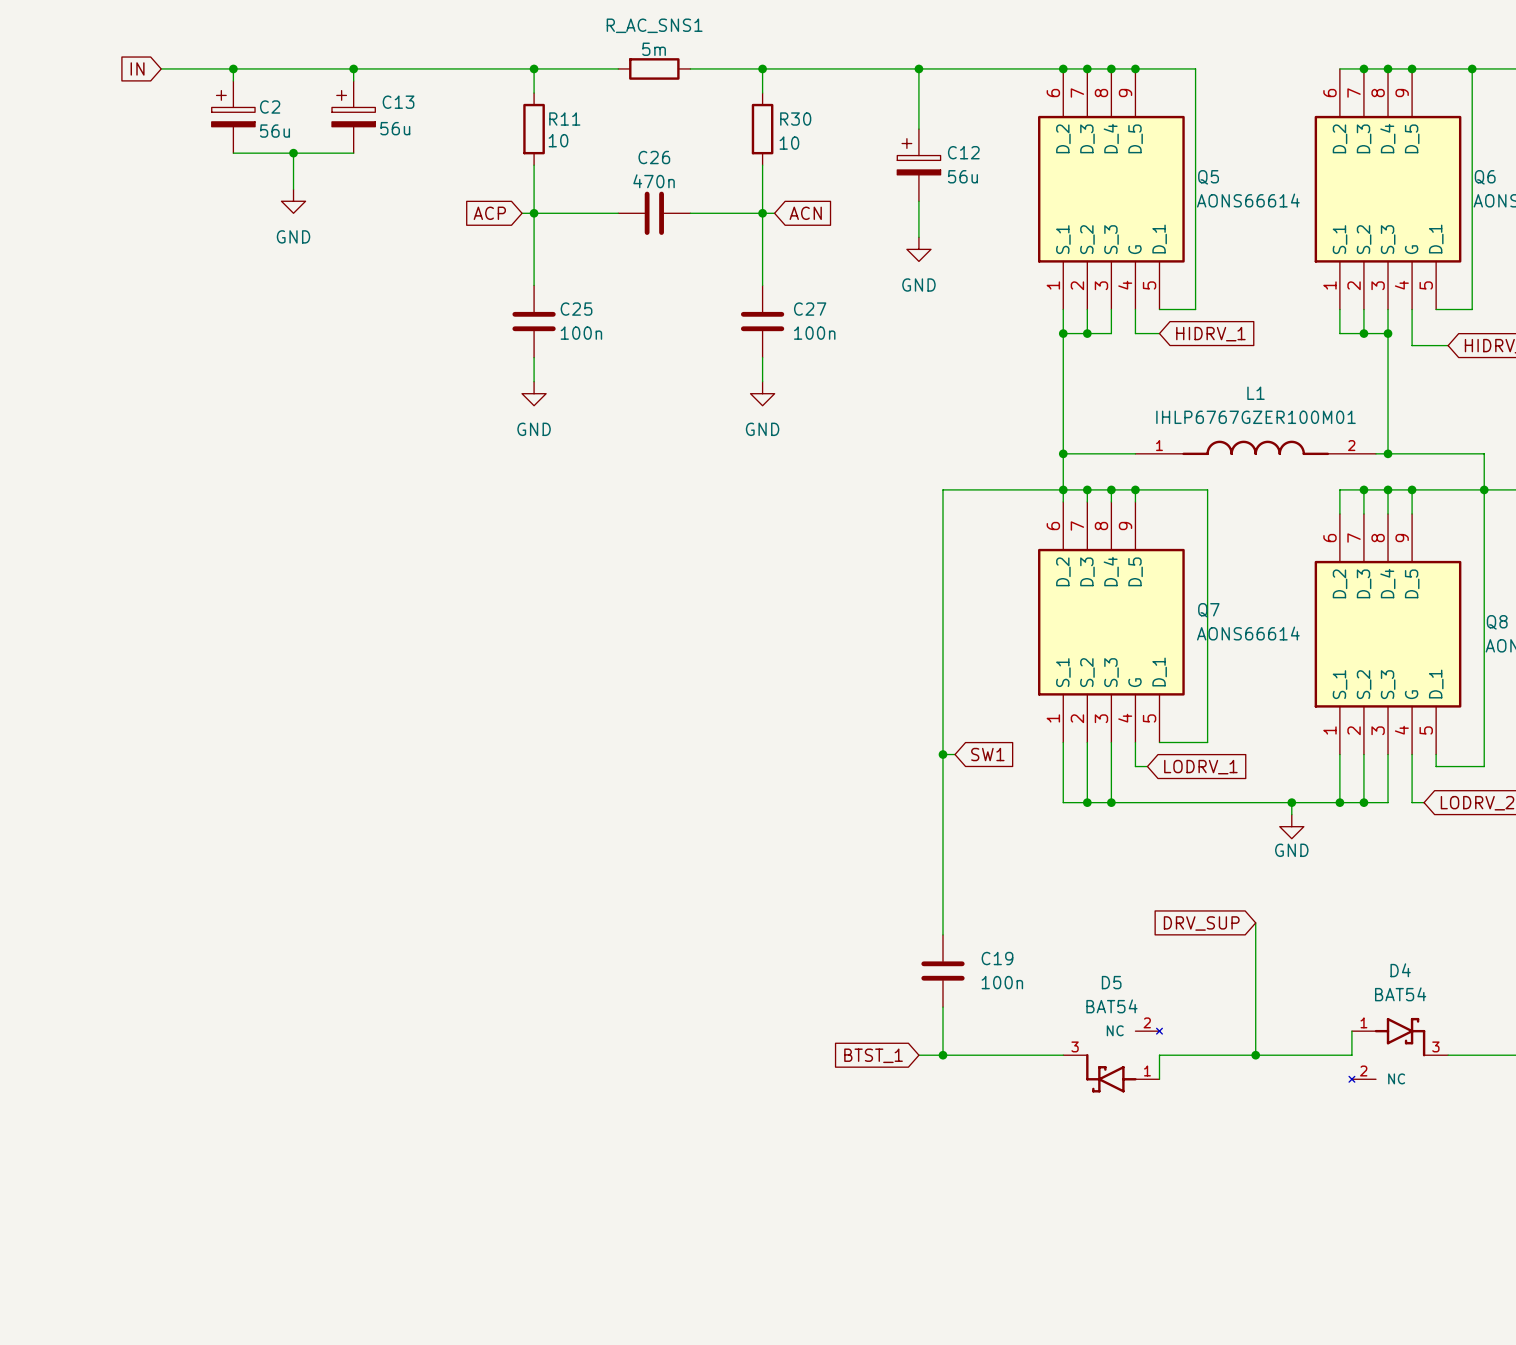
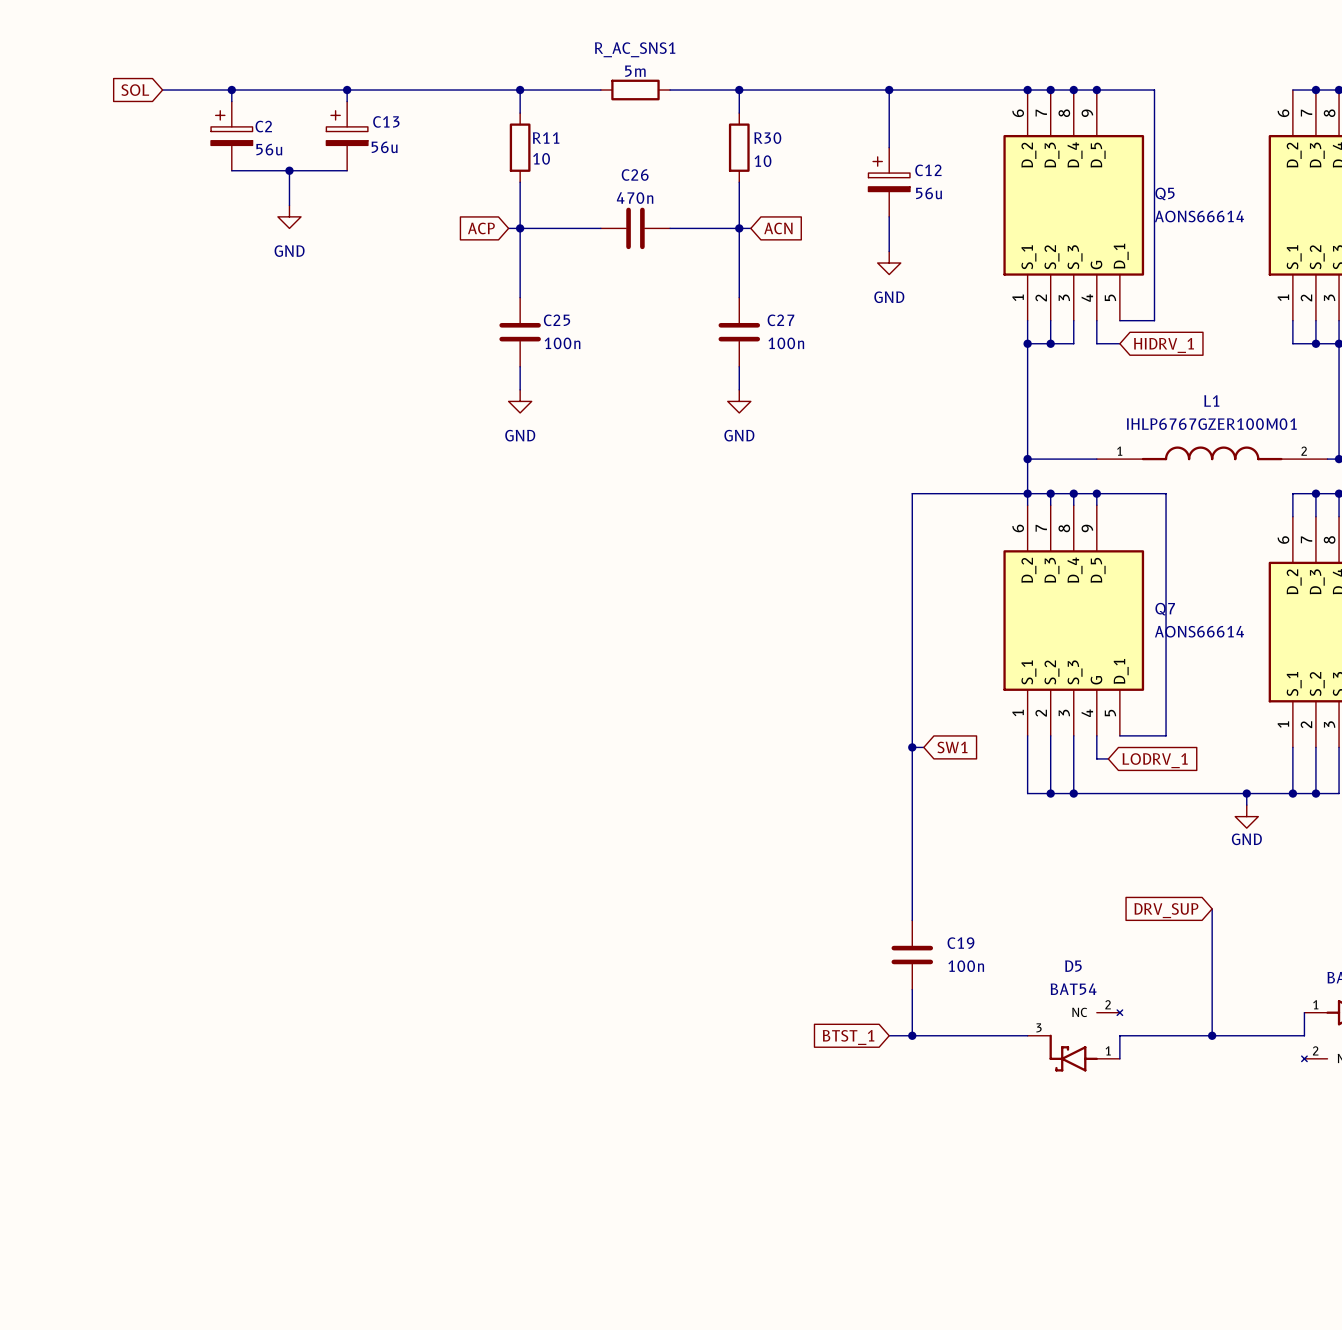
global label: IN (137, 68) -> SOL (135, 90)

